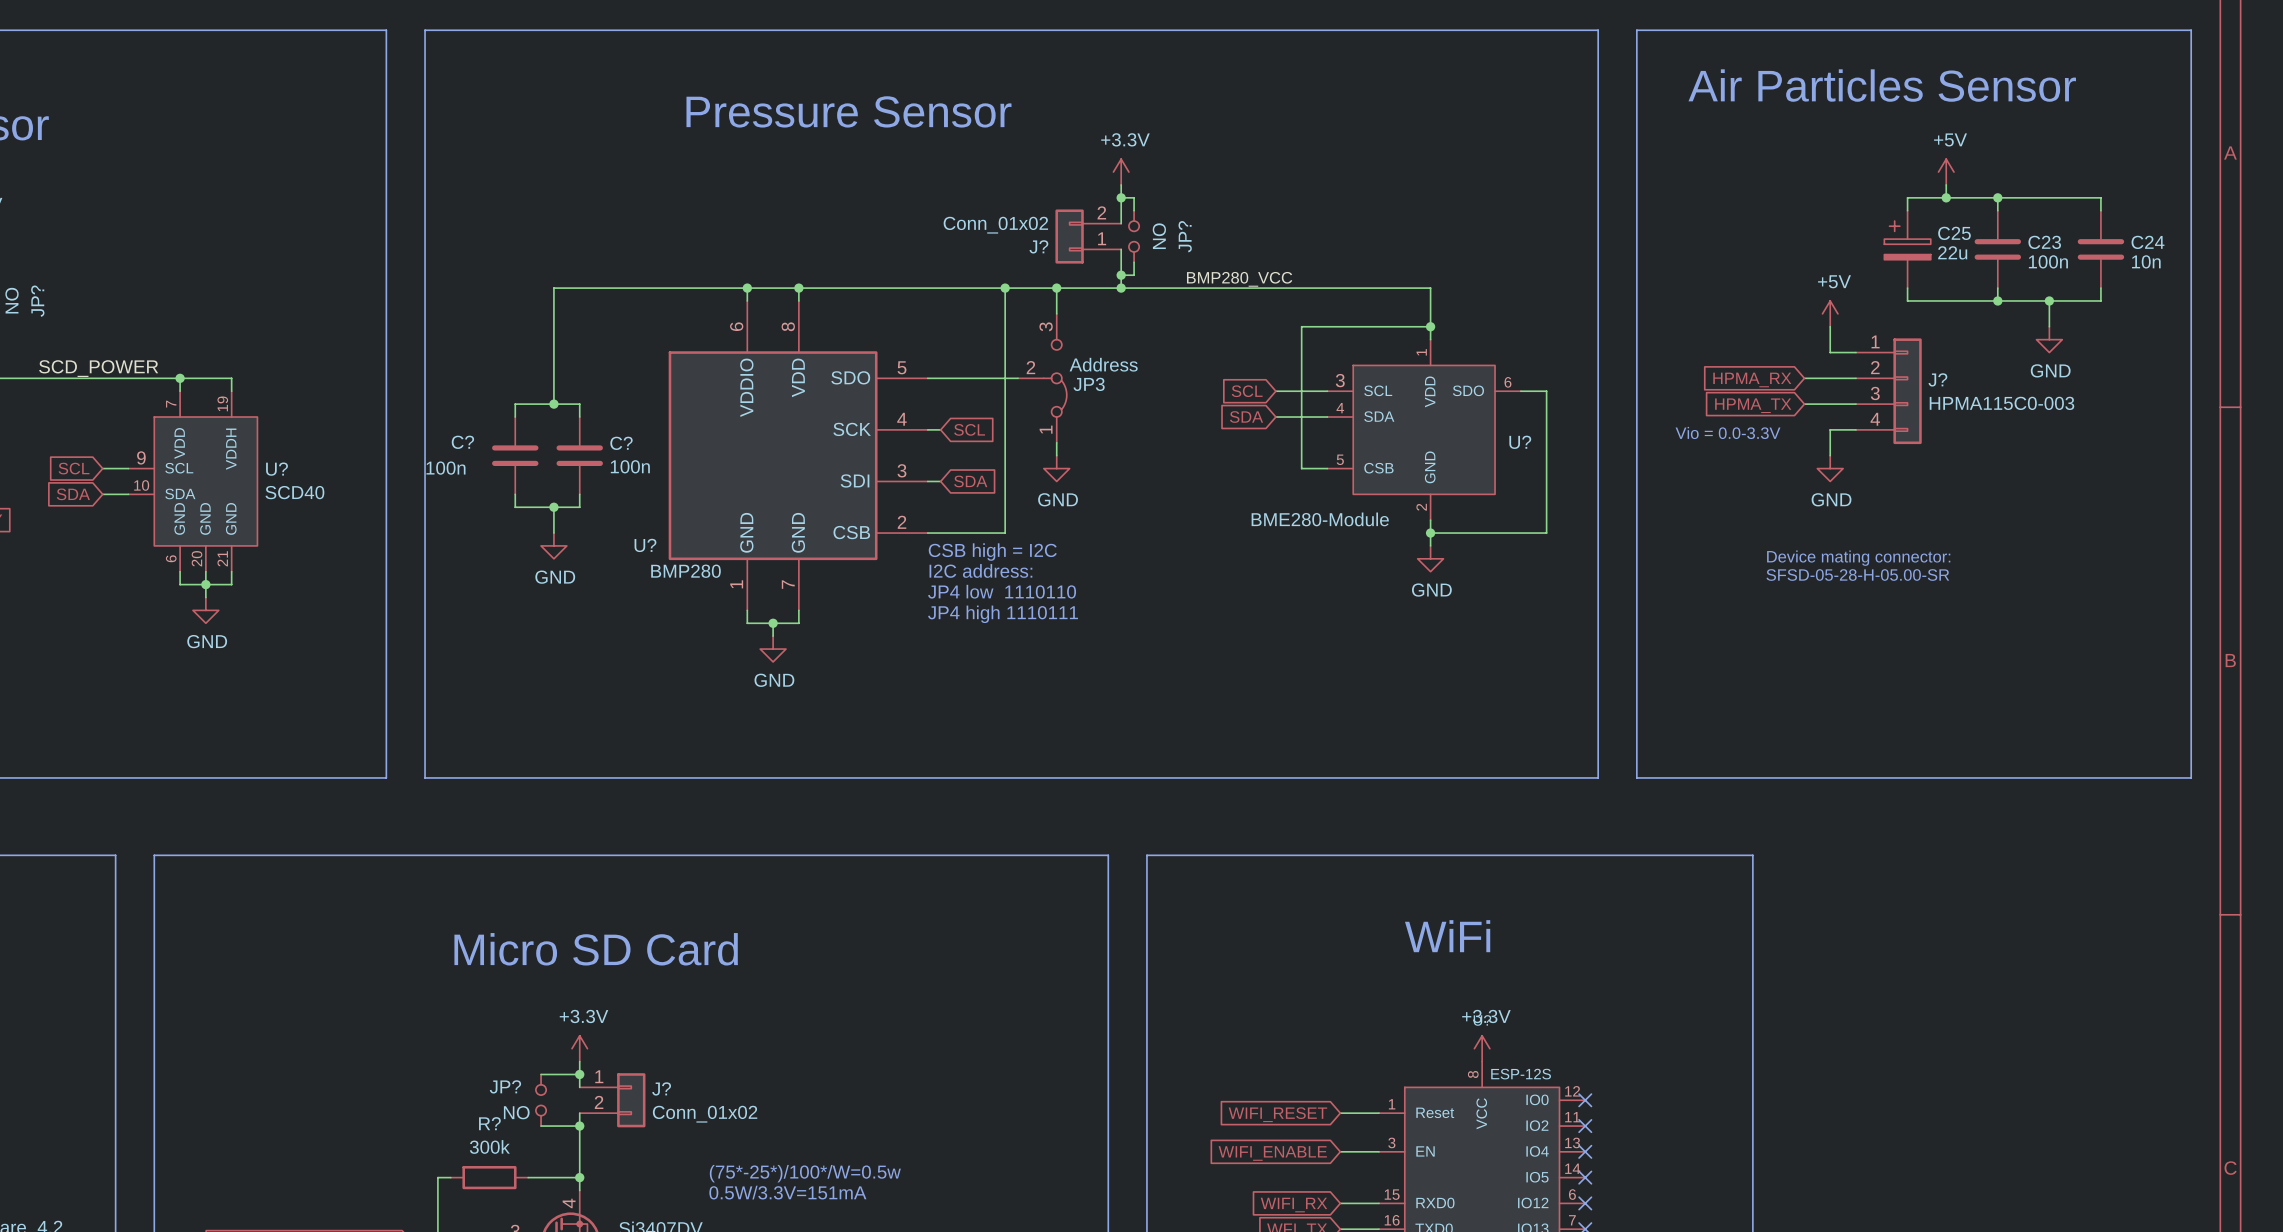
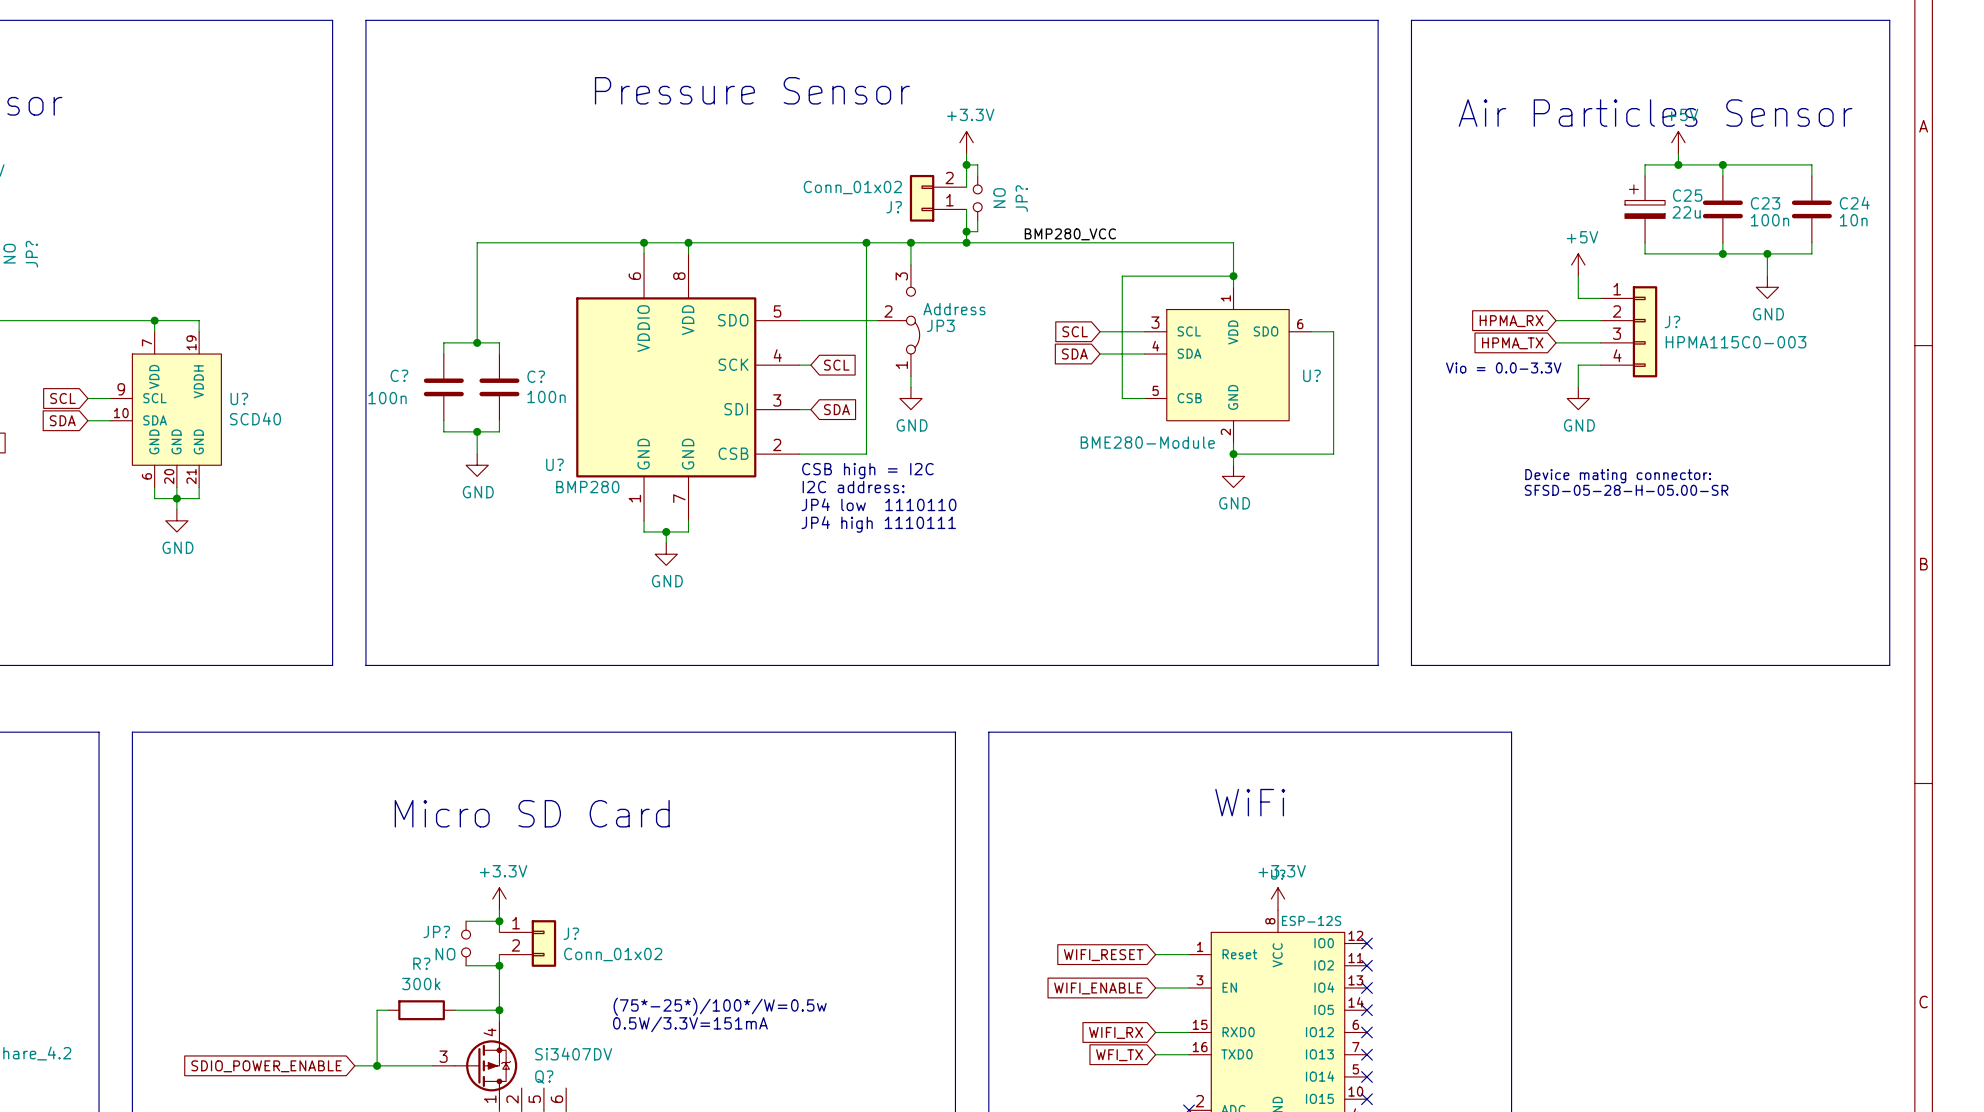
text position: Air Particles Sensor (1882, 85) -> Air Particles Sensor (1655, 113)
label: SCD_POWER (98, 368) -> none

